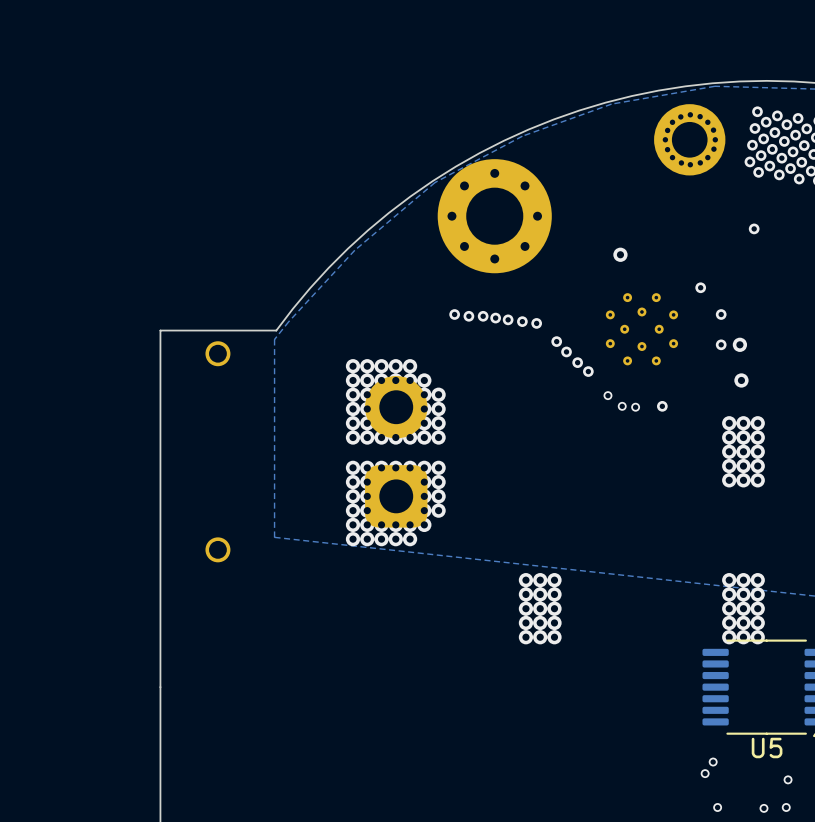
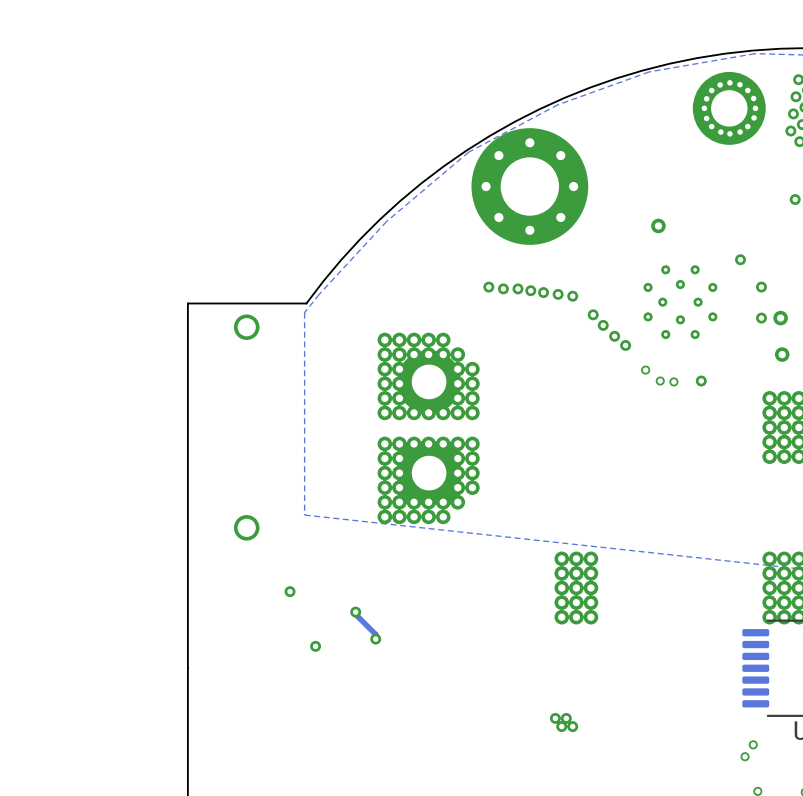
via: none -> (290, 591)
track: none -> (355, 612) (356, 615) (375, 634) (375, 639)
via: none -> (355, 612)
via: none -> (375, 639)
via: none -> (315, 646)
via: none -> (555, 718)
via: none -> (566, 718)
via: none -> (561, 726)
via: none -> (572, 726)

